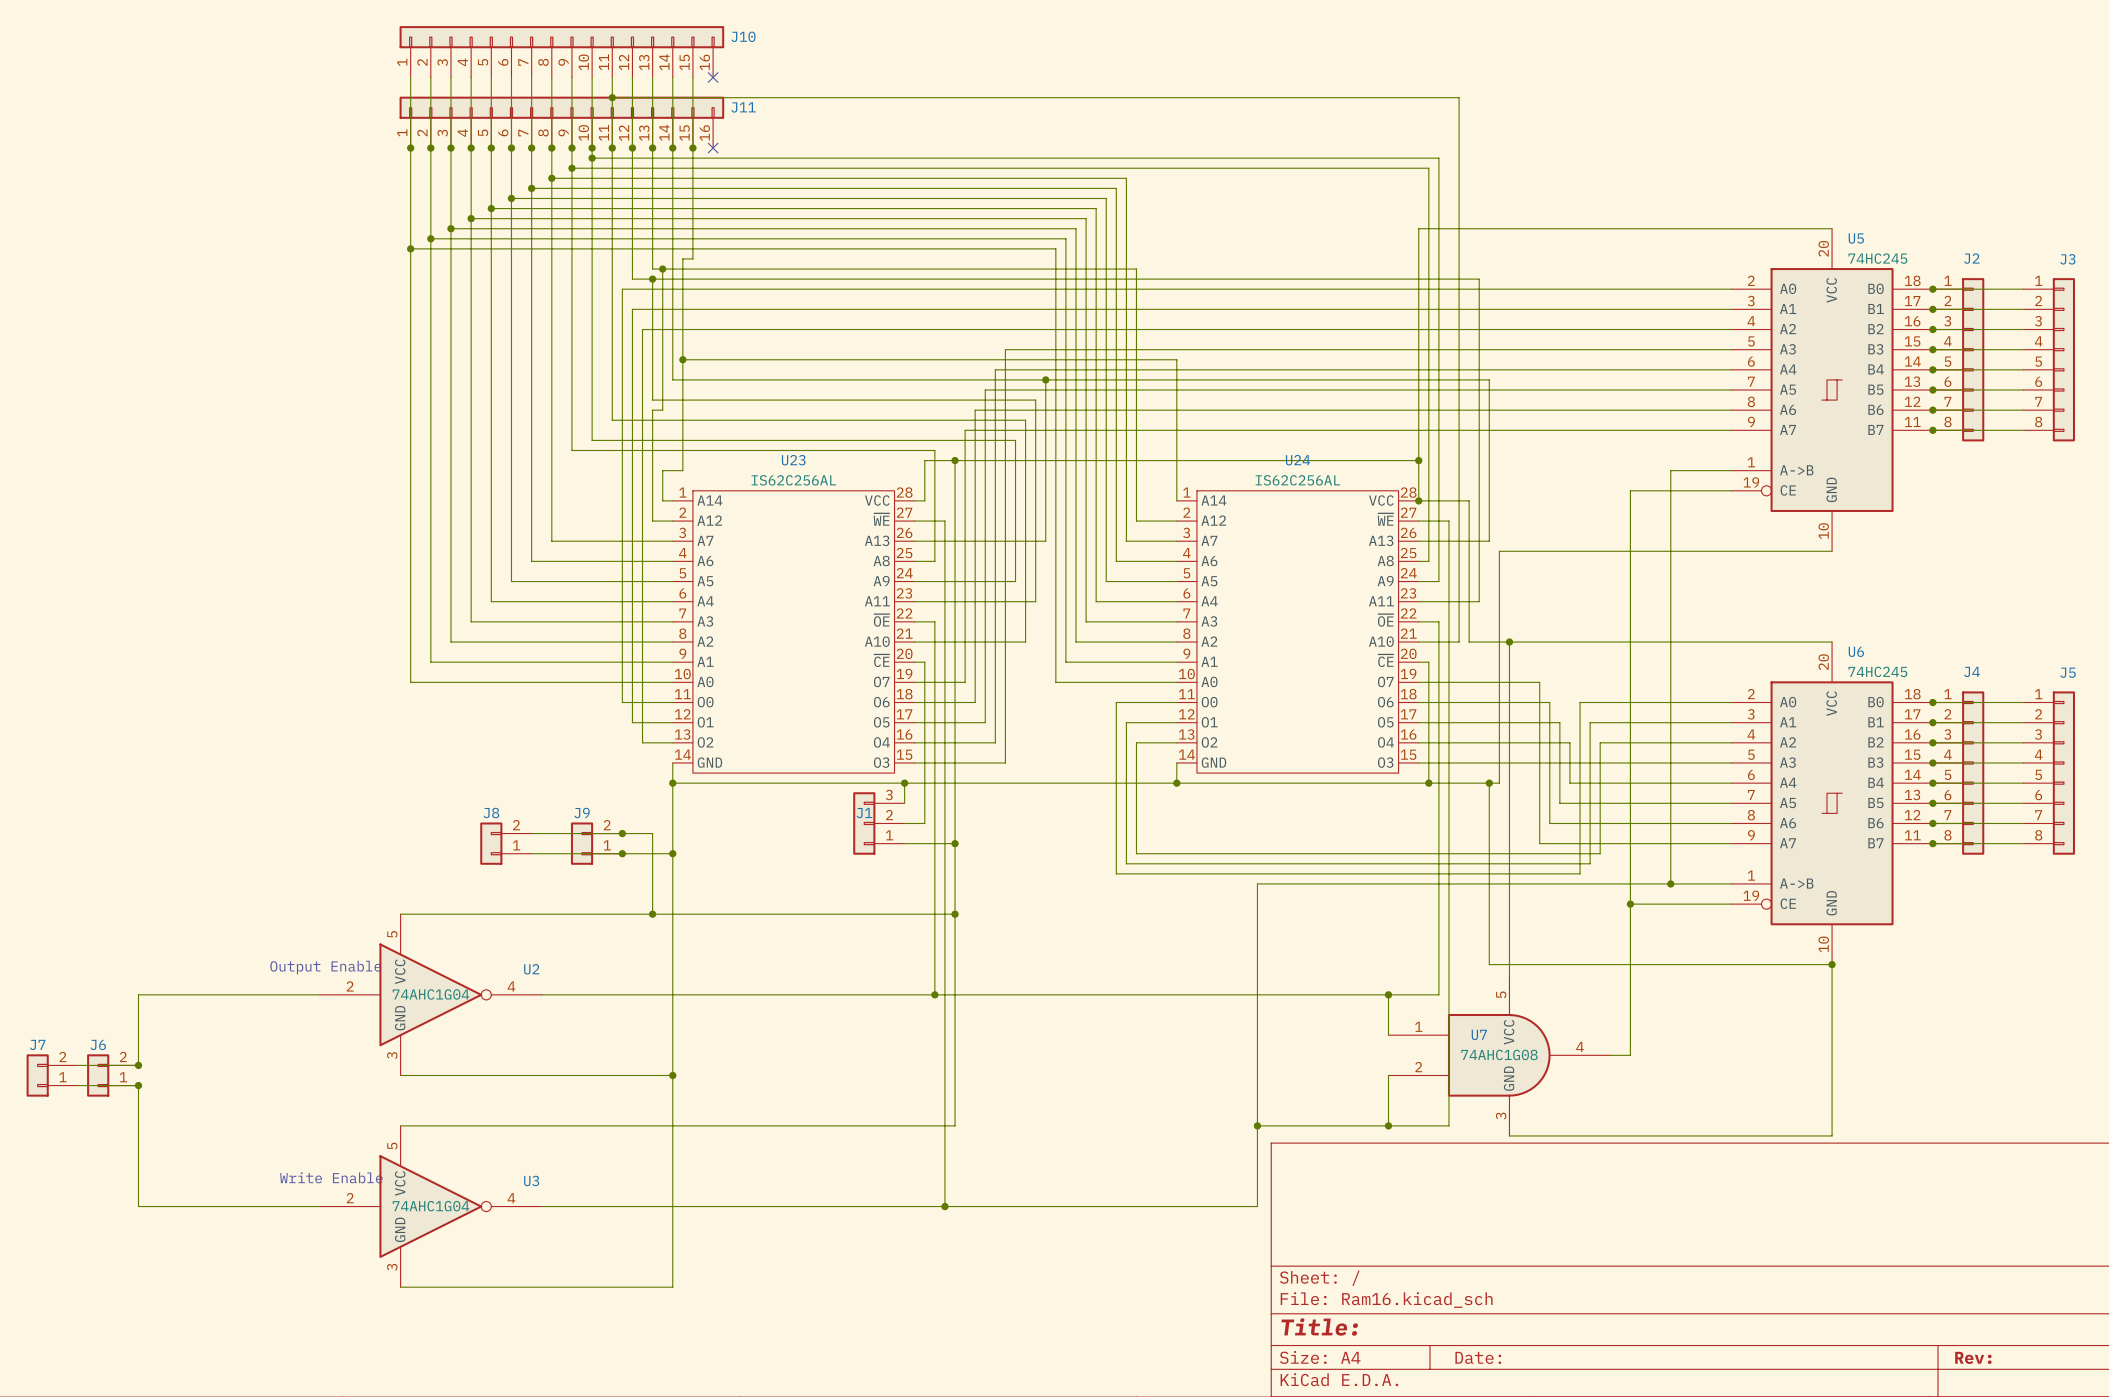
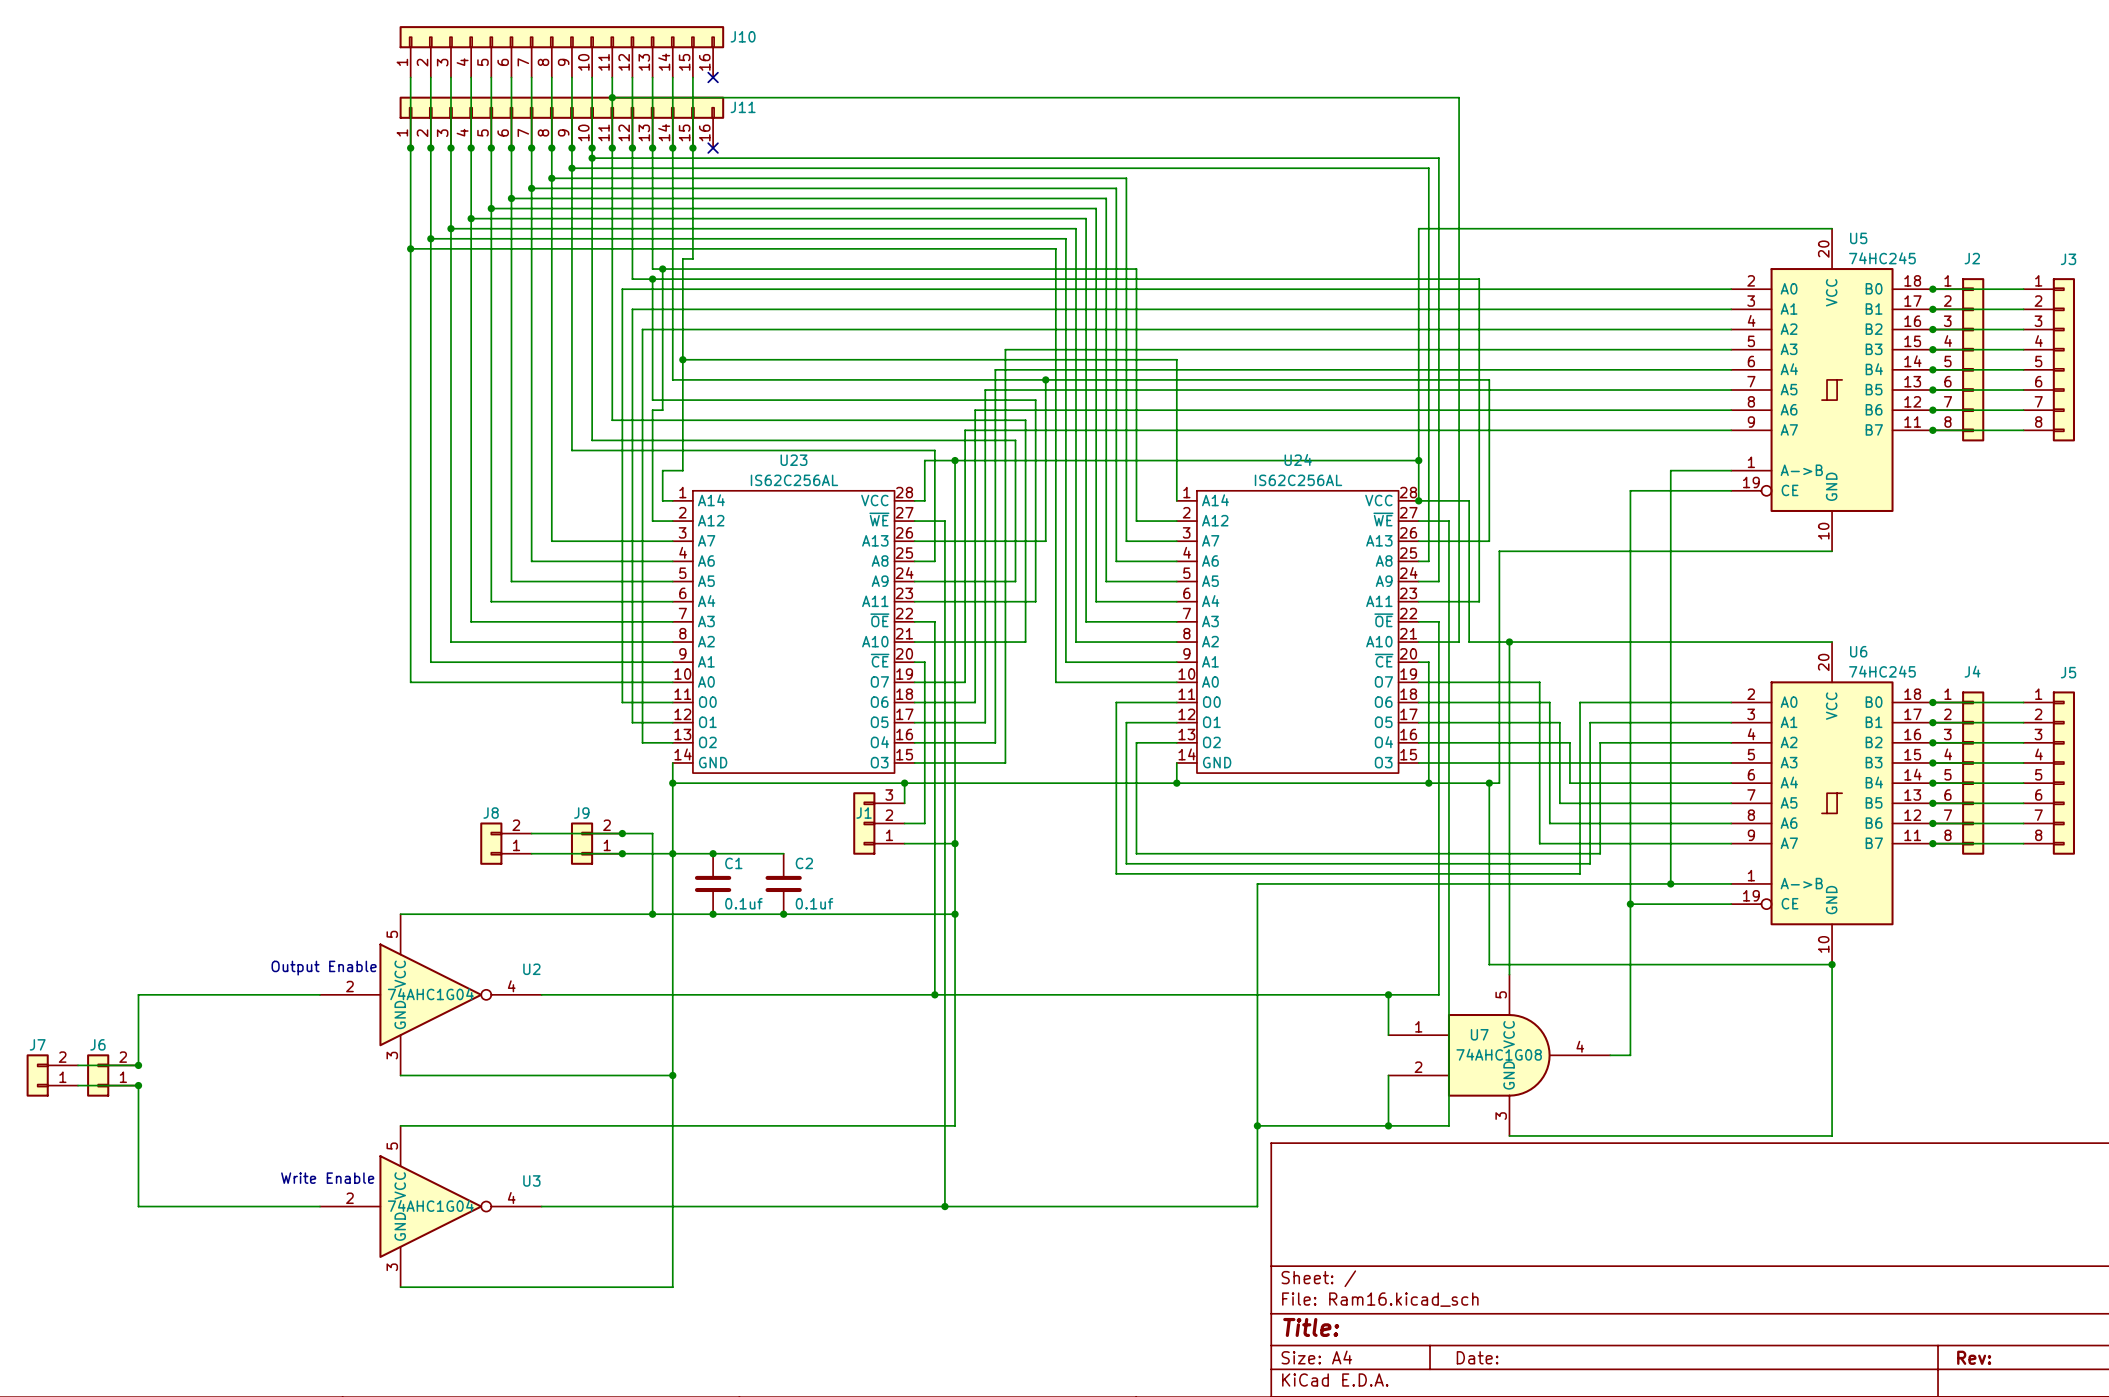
wire: none -> (672, 853) (783, 853)
junction: none -> (713, 853)
C1: none -> 0.1uf (713, 883)
C2: none -> 0.1uf (783, 883)
junction: none -> (713, 914)
junction: none -> (783, 914)

